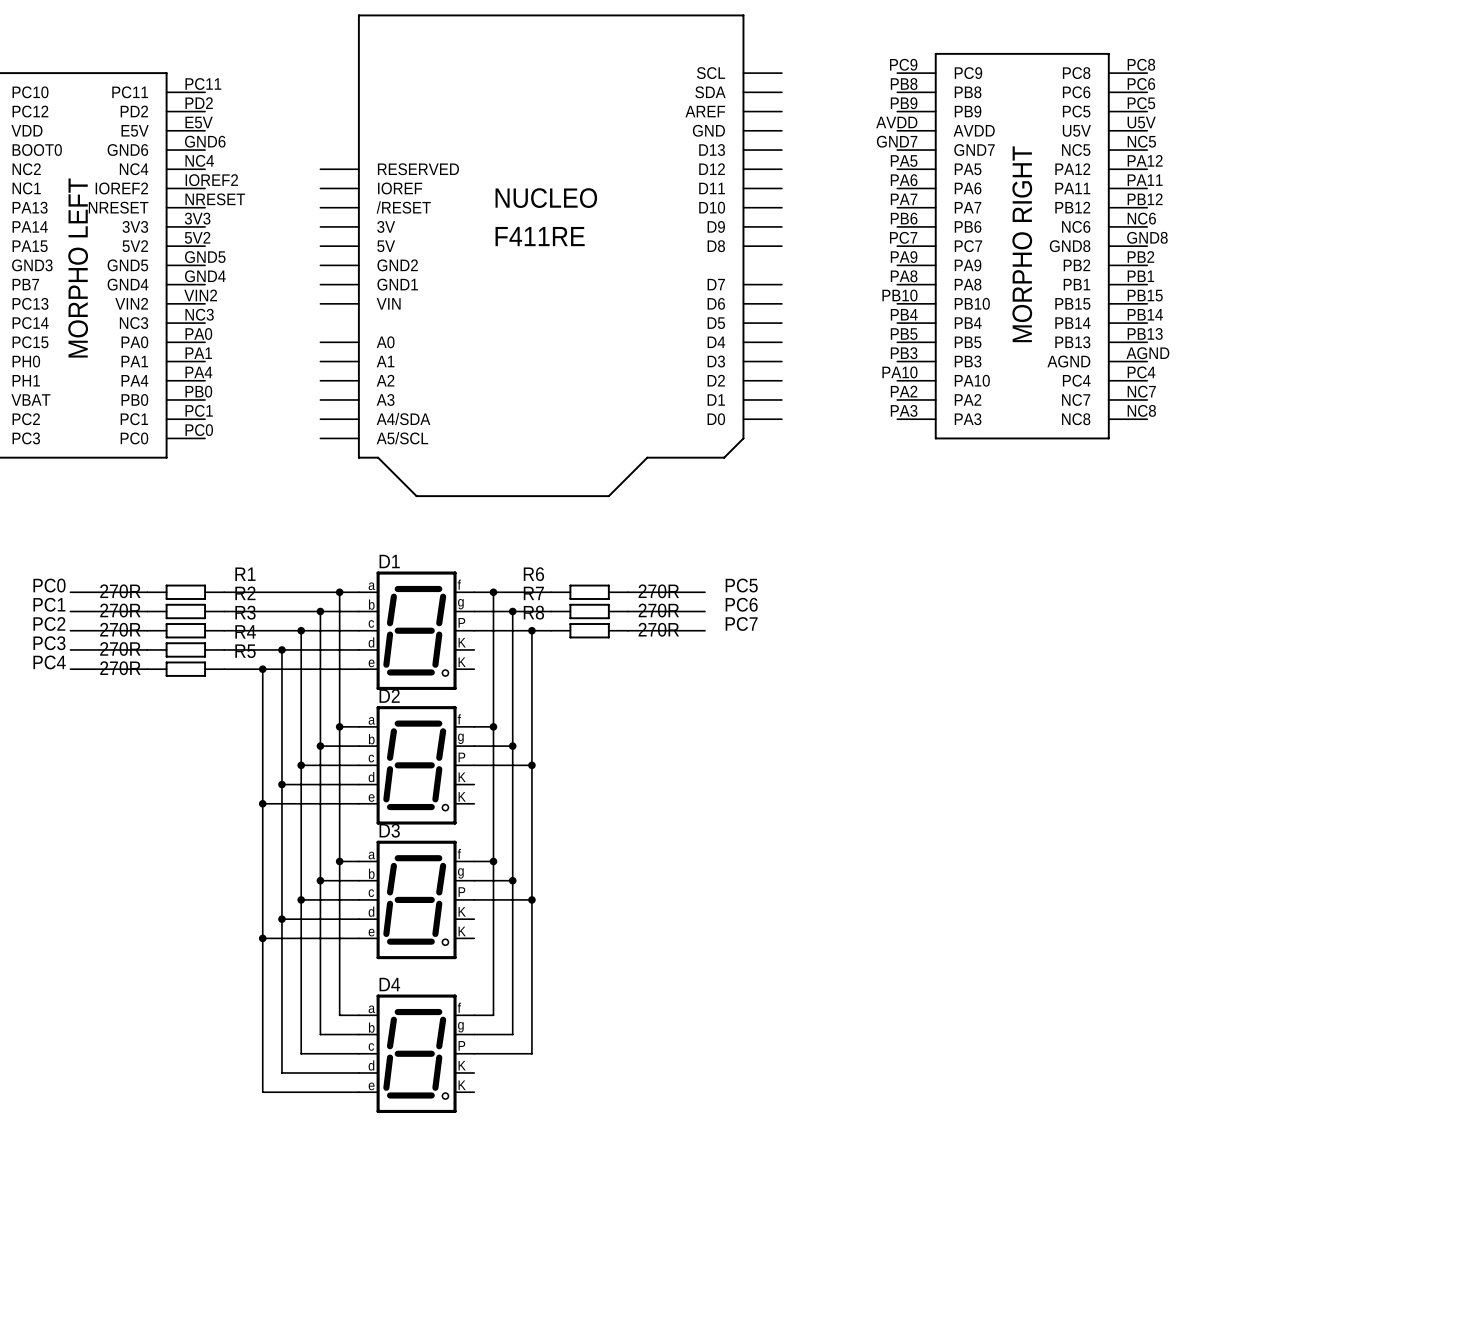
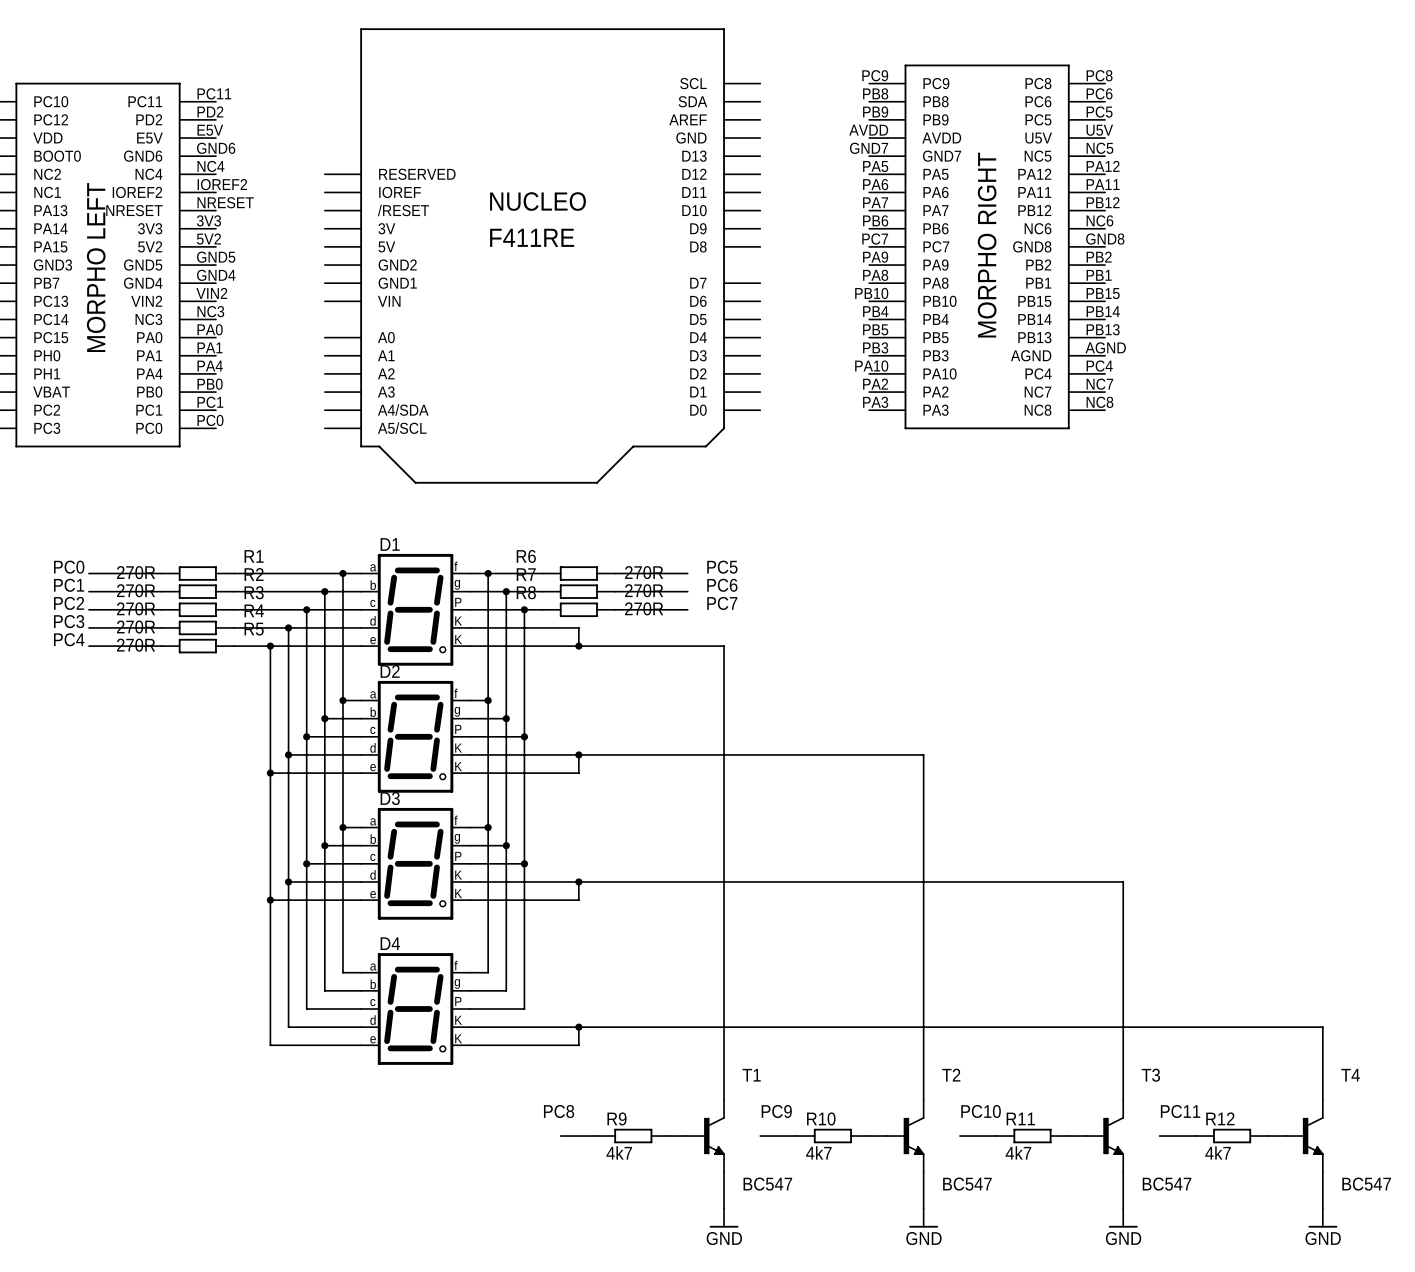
wire: none -> (470, 627) (578, 627) (578, 646)
wire: none -> (470, 646) (724, 646) (724, 1099)
junction: none -> (578, 646)
wire: none -> (470, 754) (923, 754) (923, 1099)
wire: none -> (578, 754) (578, 773) (470, 773)
junction: none -> (578, 754)
wire: none -> (470, 881) (1123, 881) (1123, 1099)
wire: none -> (578, 881) (578, 900) (470, 900)
junction: none -> (578, 881)
wire: none -> (470, 1027) (1322, 1027) (1322, 1099)
wire: none -> (578, 1027) (578, 1045) (470, 1045)
junction: none -> (578, 1027)
text: none -> PC8 (559, 1111)
text: none -> PC9 (776, 1111)
text: none -> PC10 (981, 1111)
text: none -> PC11 (1180, 1111)
wire: none -> (560, 1136) (597, 1136)
R9: none -> 4k7 (633, 1136)
wire: none -> (669, 1136) (687, 1136)
T1: none -> BC547 (706, 1136)
wire: none -> (760, 1136) (796, 1136)
R10: none -> 4k7 (832, 1136)
wire: none -> (869, 1136) (887, 1136)
T2: none -> BC547 (905, 1136)
wire: none -> (959, 1136) (996, 1136)
R11: none -> 4k7 (1032, 1136)
wire: none -> (1068, 1136) (1086, 1136)
T3: none -> BC547 (1105, 1136)
wire: none -> (1159, 1136) (1195, 1136)
R12: none -> 4k7 (1232, 1136)
wire: none -> (1268, 1136) (1286, 1136)
T4: none -> BC547 (1304, 1136)
wire: none -> (724, 1172) (724, 1208)
wire: none -> (923, 1172) (923, 1208)
wire: none -> (1123, 1172) (1123, 1208)
wire: none -> (1322, 1172) (1322, 1208)
power symbol: none -> GND (724, 1218)
power symbol: none -> GND (923, 1218)
power symbol: none -> GND (1123, 1218)
power symbol: none -> GND (1322, 1218)

